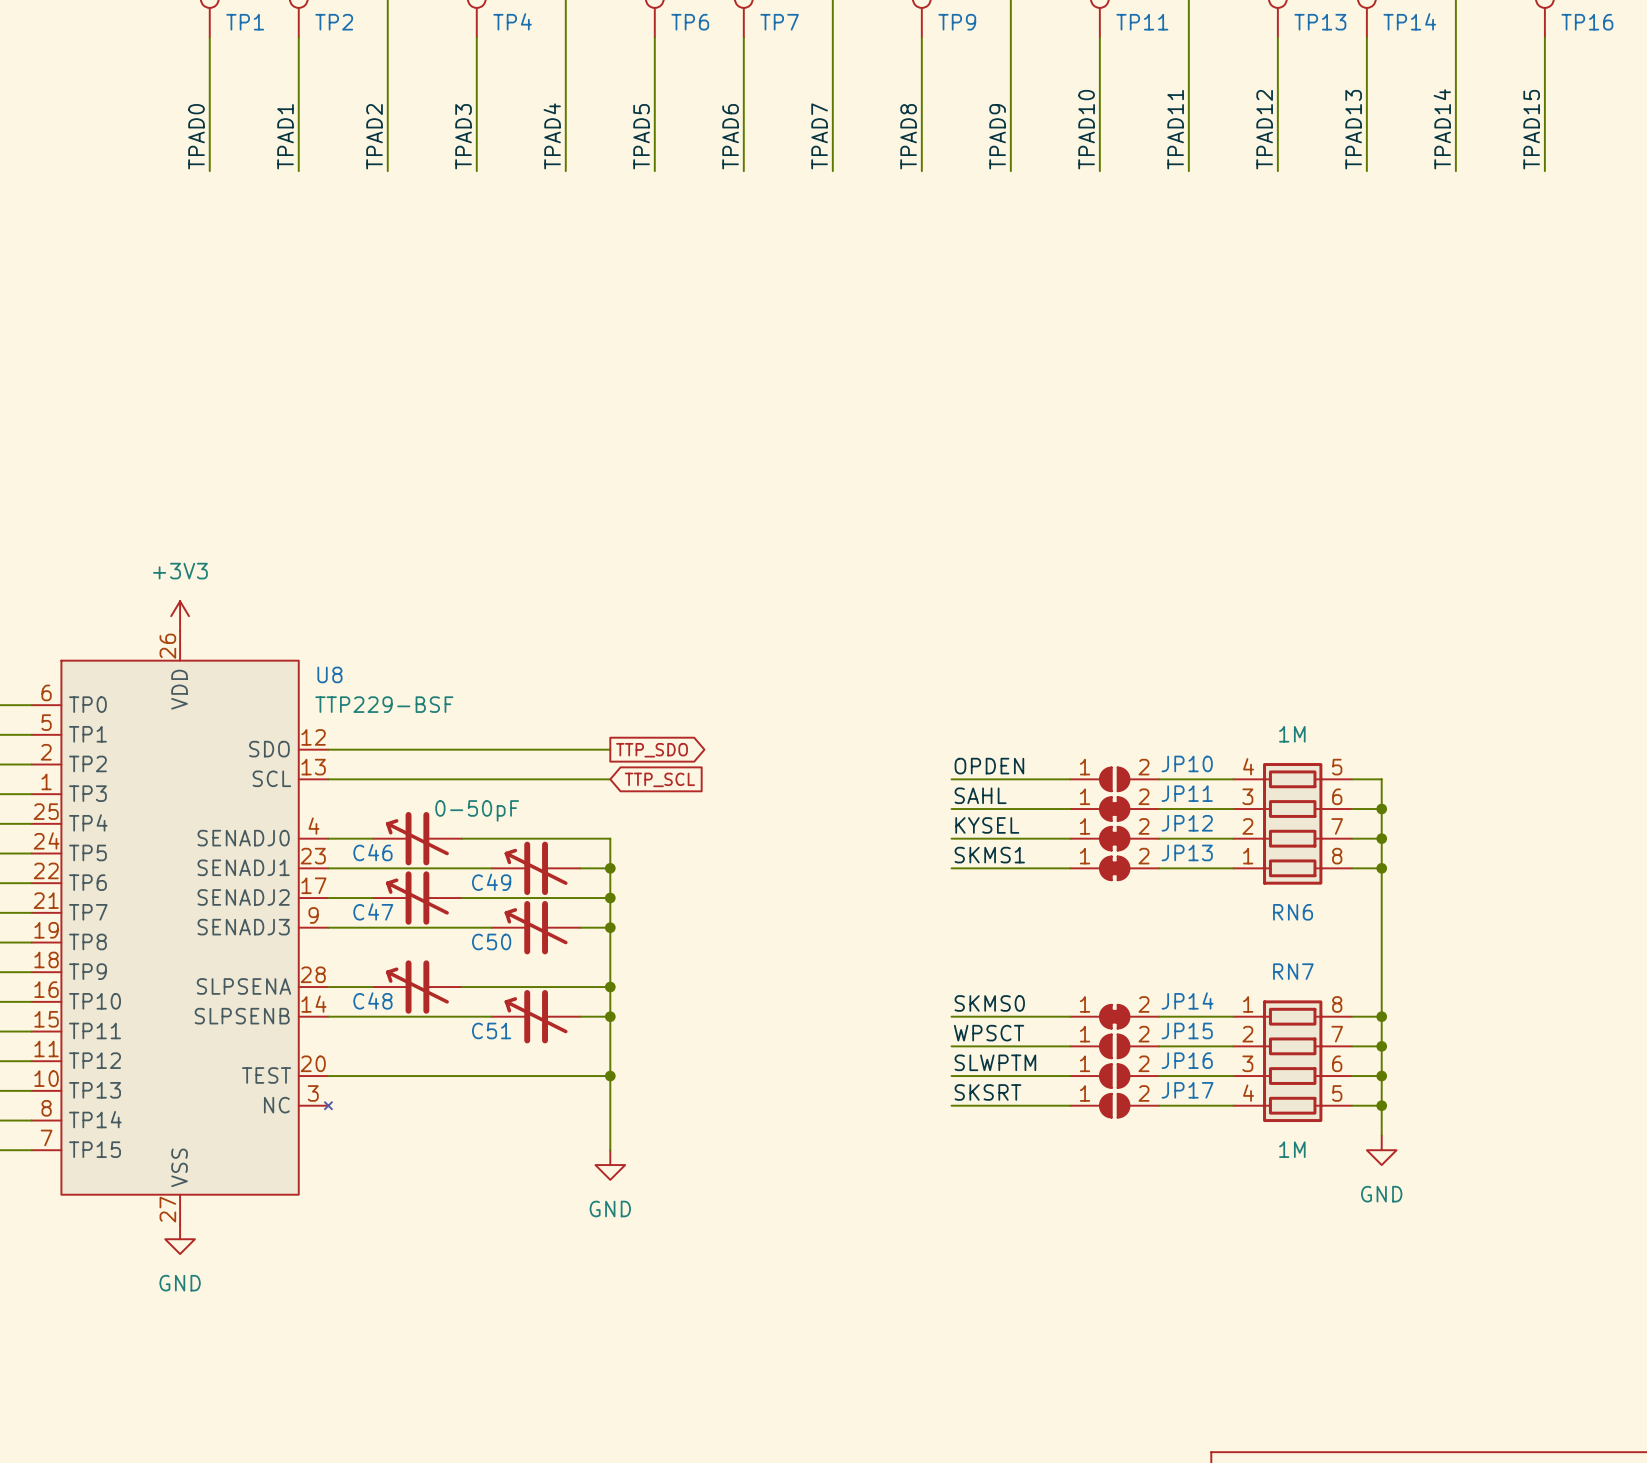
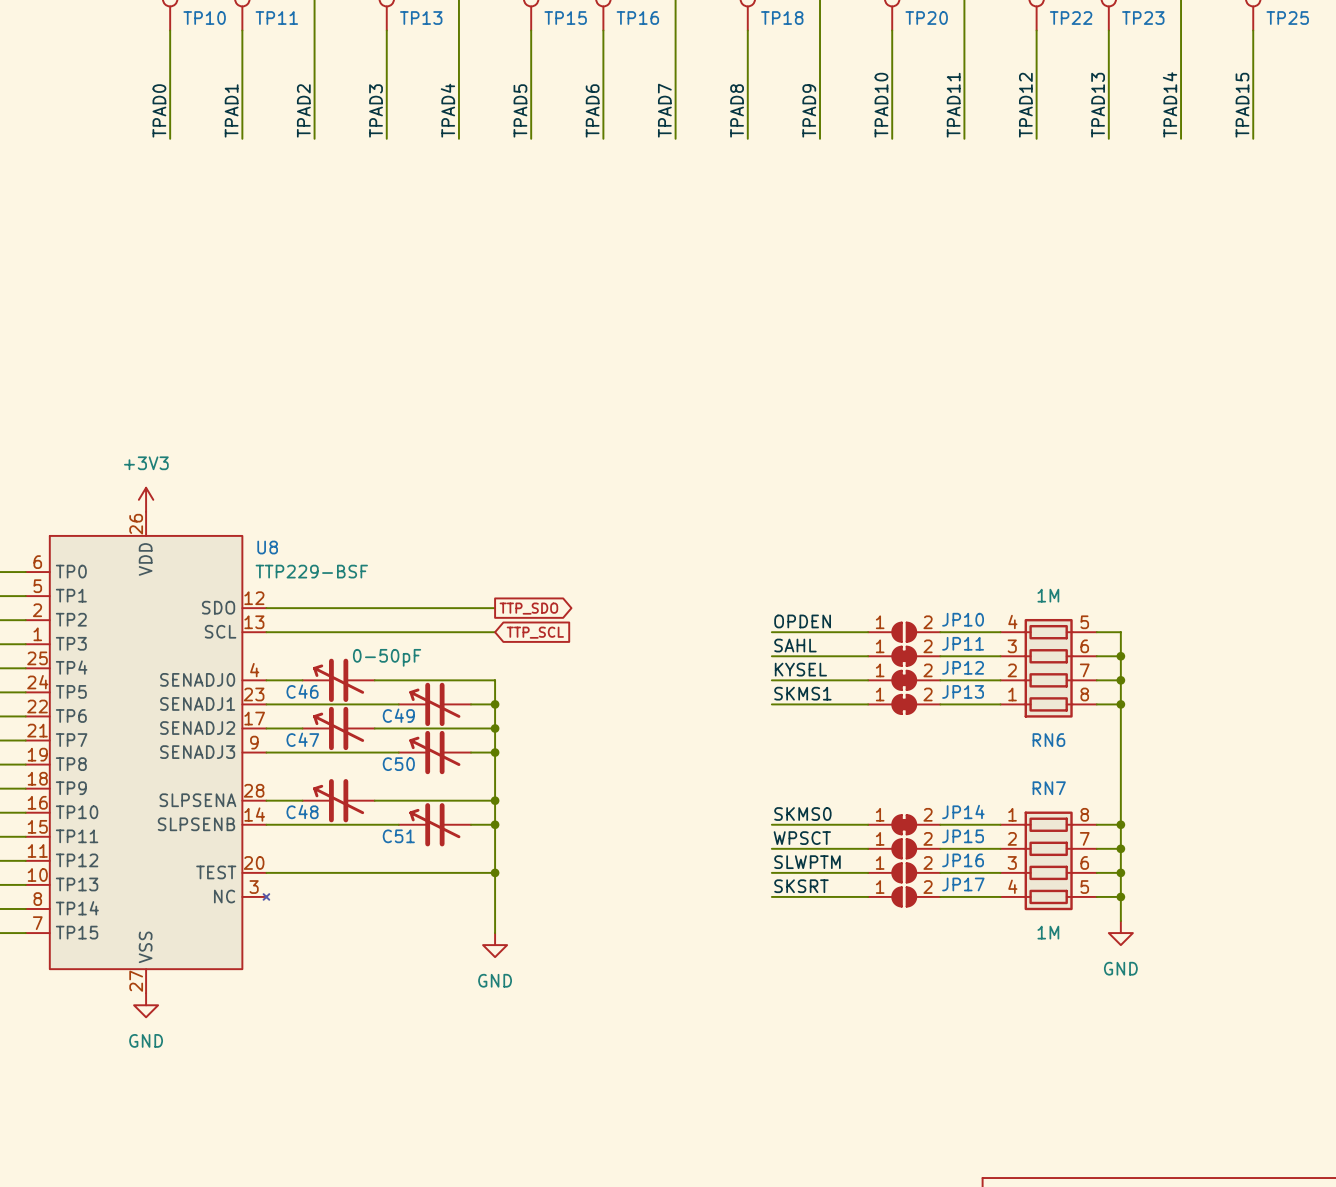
TP4 name: TP4 (512, 21) -> TP13 (421, 18)
TP14 name: TP14 (1409, 21) -> TP23 (1143, 18)
TP1 name: TP1 (245, 22) -> TP10 (204, 18)
TP2 name: TP2 (334, 22) -> TP11 (276, 18)
TP6 name: TP6 (690, 22) -> TP15 (565, 18)
TP7 name: TP7 (779, 22) -> TP16 (637, 18)
TP9 name: TP9 (957, 22) -> TP18 (782, 18)
TP11 name: TP11 (1142, 22) -> TP20 (926, 18)
TP13 name: TP13 (1320, 22) -> TP22 (1071, 18)
TP16 name: TP16 (1587, 22) -> TP25 (1287, 18)

